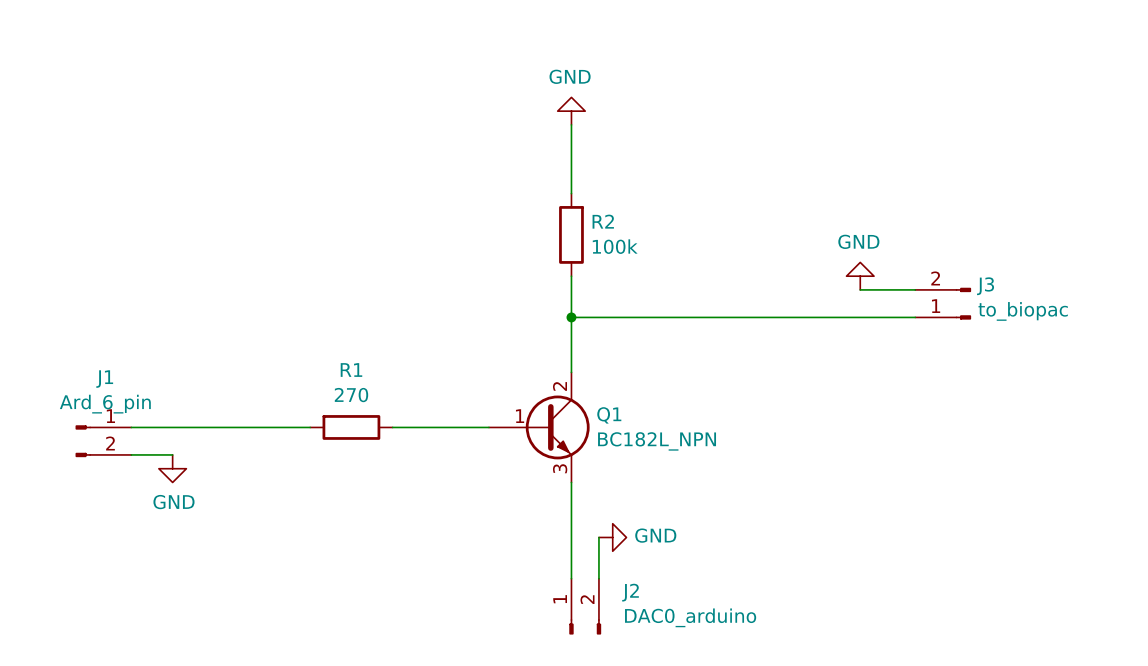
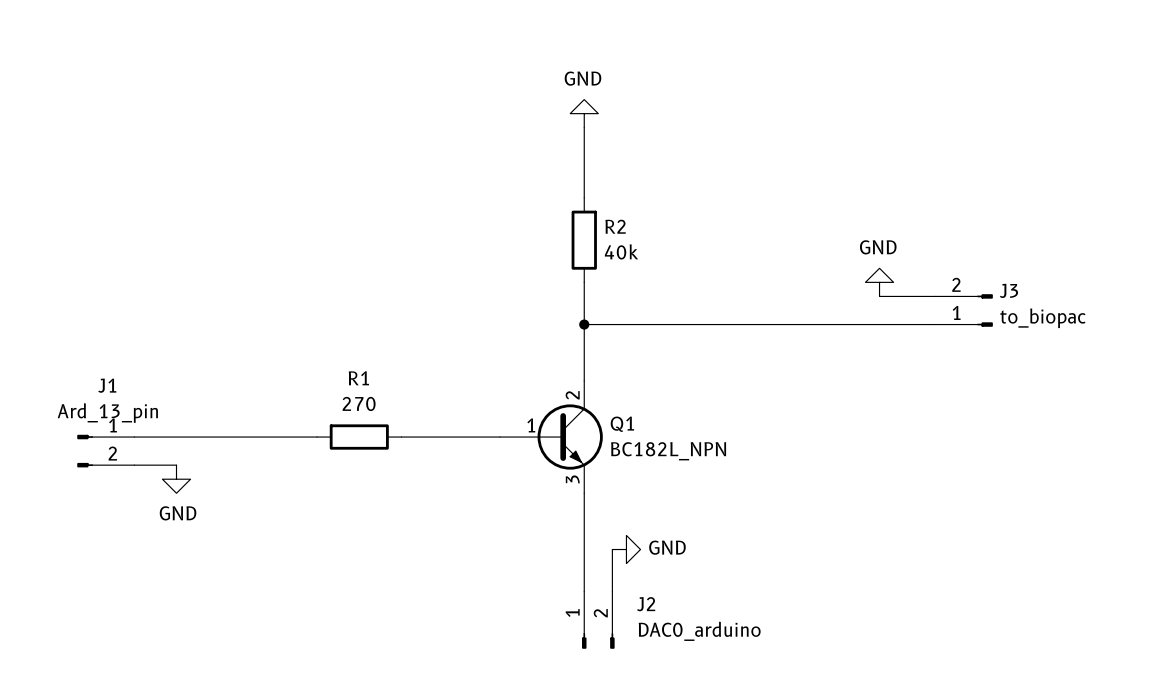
R2 value: 100k (615, 246) -> 40k (621, 251)
J1 value: Ard_6_pin (105, 404) -> Ard_13_pin (107, 413)

